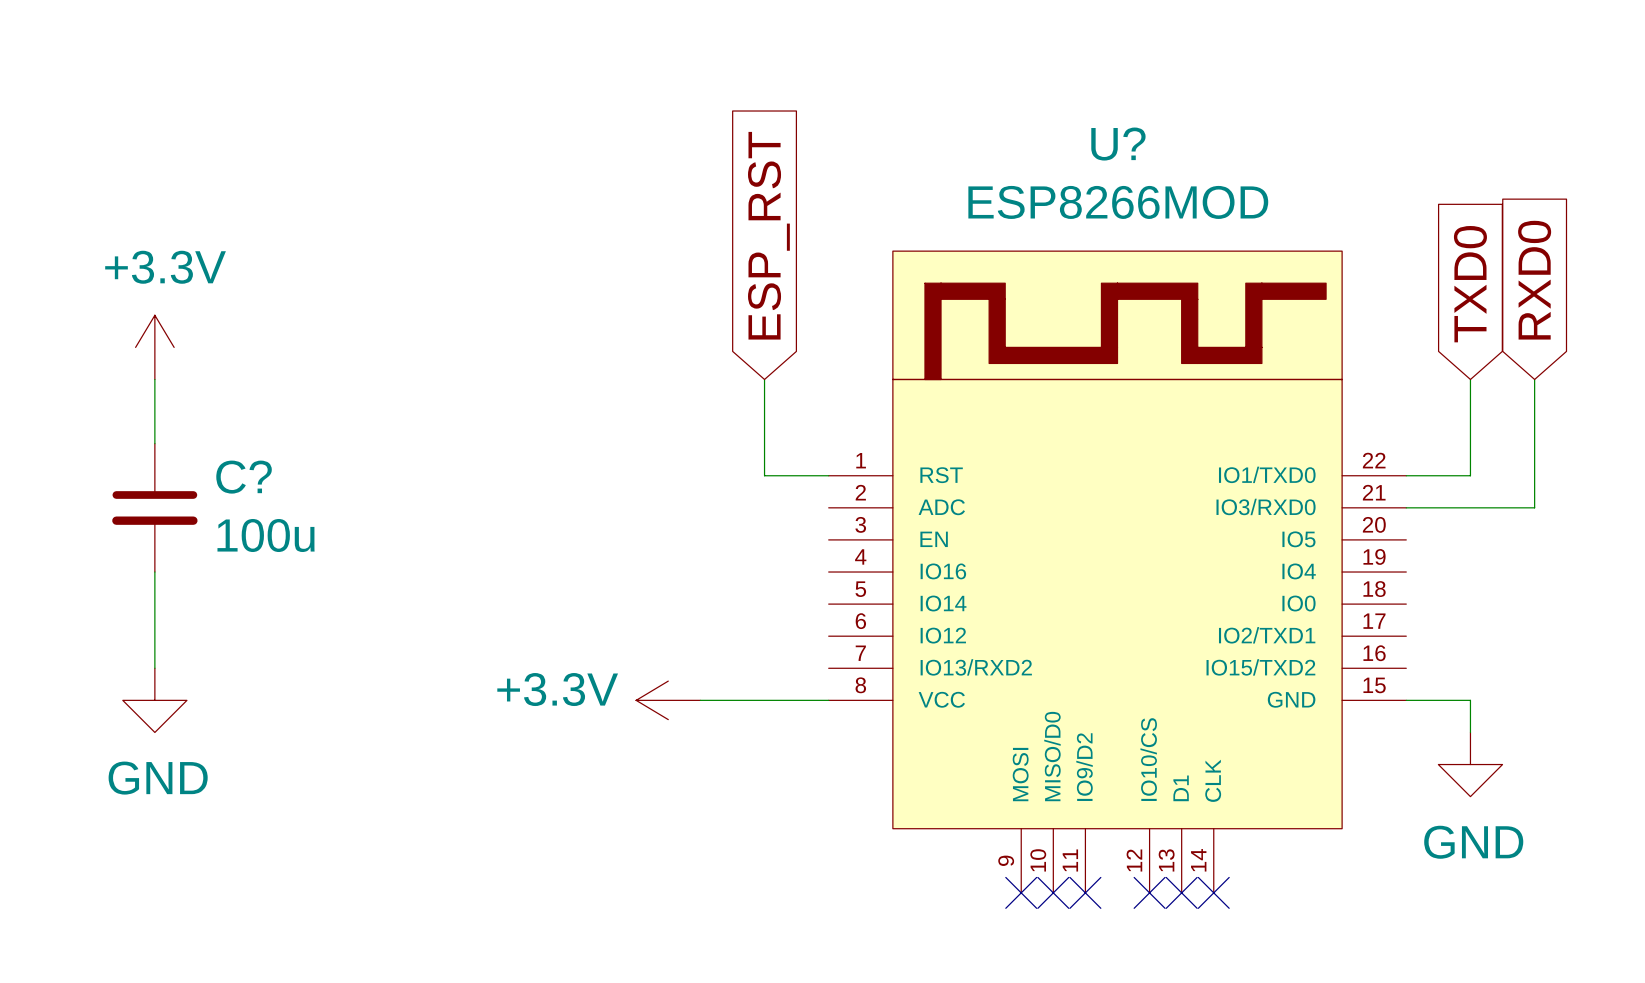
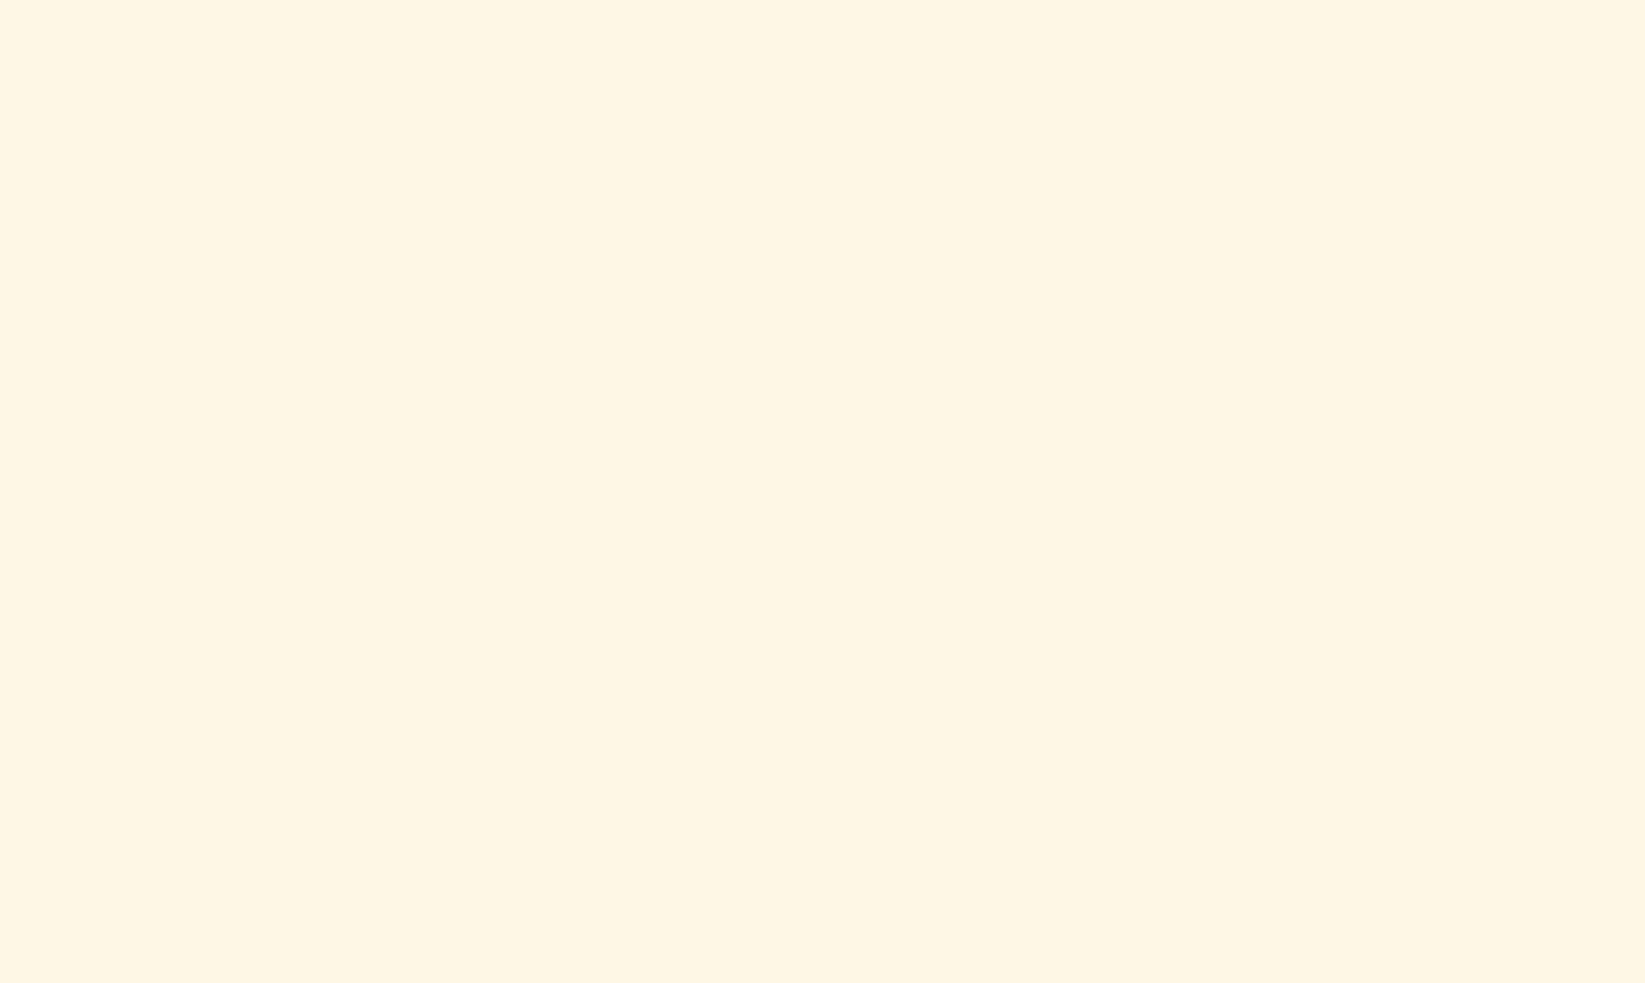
global label: ESP_RST (768, 235) -> none
global label: RXD0 (1534, 280) -> none
global label: TXD0 (1470, 284) -> none
power symbol: +3.3V (154, 347) -> none
wire: (154, 379) (154, 443) -> none
wire: (764, 379) (764, 475) (828, 475) -> none
wire: (1470, 379) (1470, 475) (1406, 475) -> none
wire: (1534, 379) (1534, 507) (1406, 507) -> none
C?: 100u (154, 507) -> none
wire: (154, 572) (154, 668) -> none
U?: ESP8266MOD (1117, 572) -> none
power symbol: GND (154, 700) -> none
power symbol: +3.3V (668, 700) -> none
wire: (700, 700) (828, 700) -> none
wire: (1406, 700) (1470, 700) (1470, 732) -> none
power symbol: GND (1470, 764) -> none
no-connect mark: (1021, 892) -> none
no-connect mark: (1053, 892) -> none
no-connect mark: (1085, 892) -> none
no-connect mark: (1149, 892) -> none
no-connect mark: (1181, 892) -> none
no-connect mark: (1213, 892) -> none

